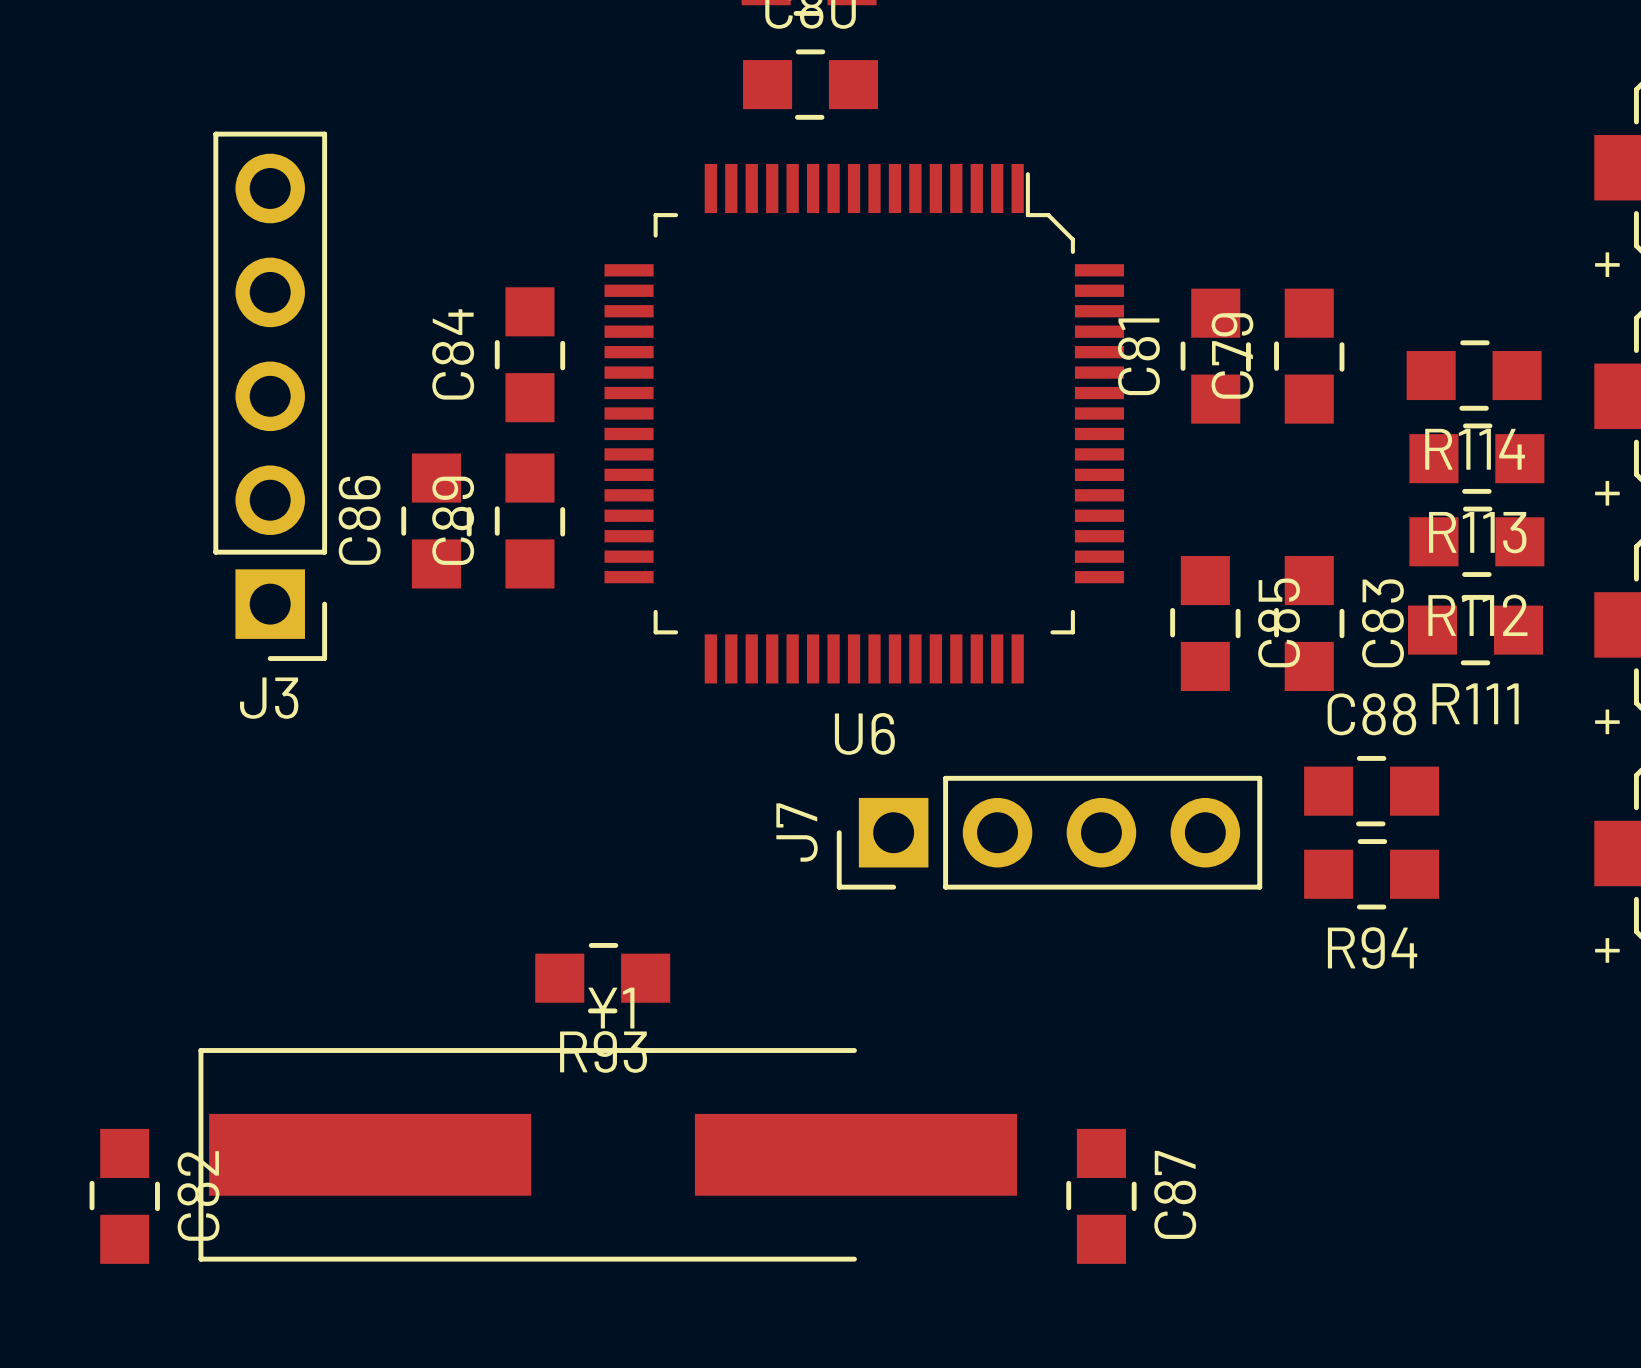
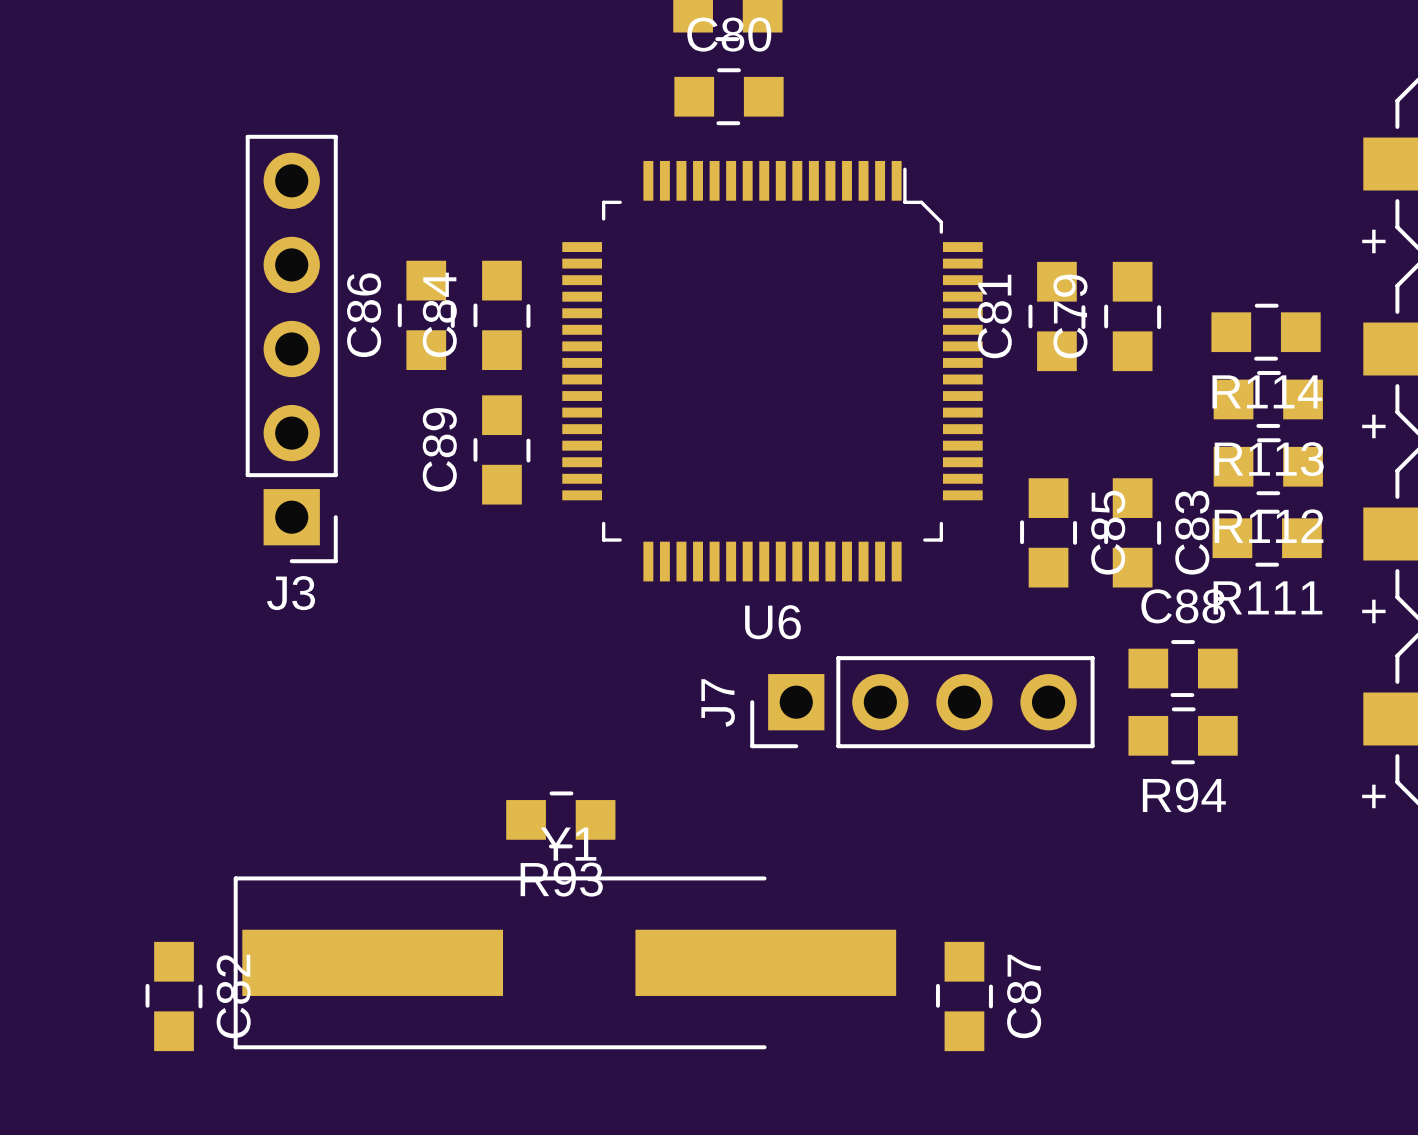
C86 position: (436, 521) -> (426, 315)

